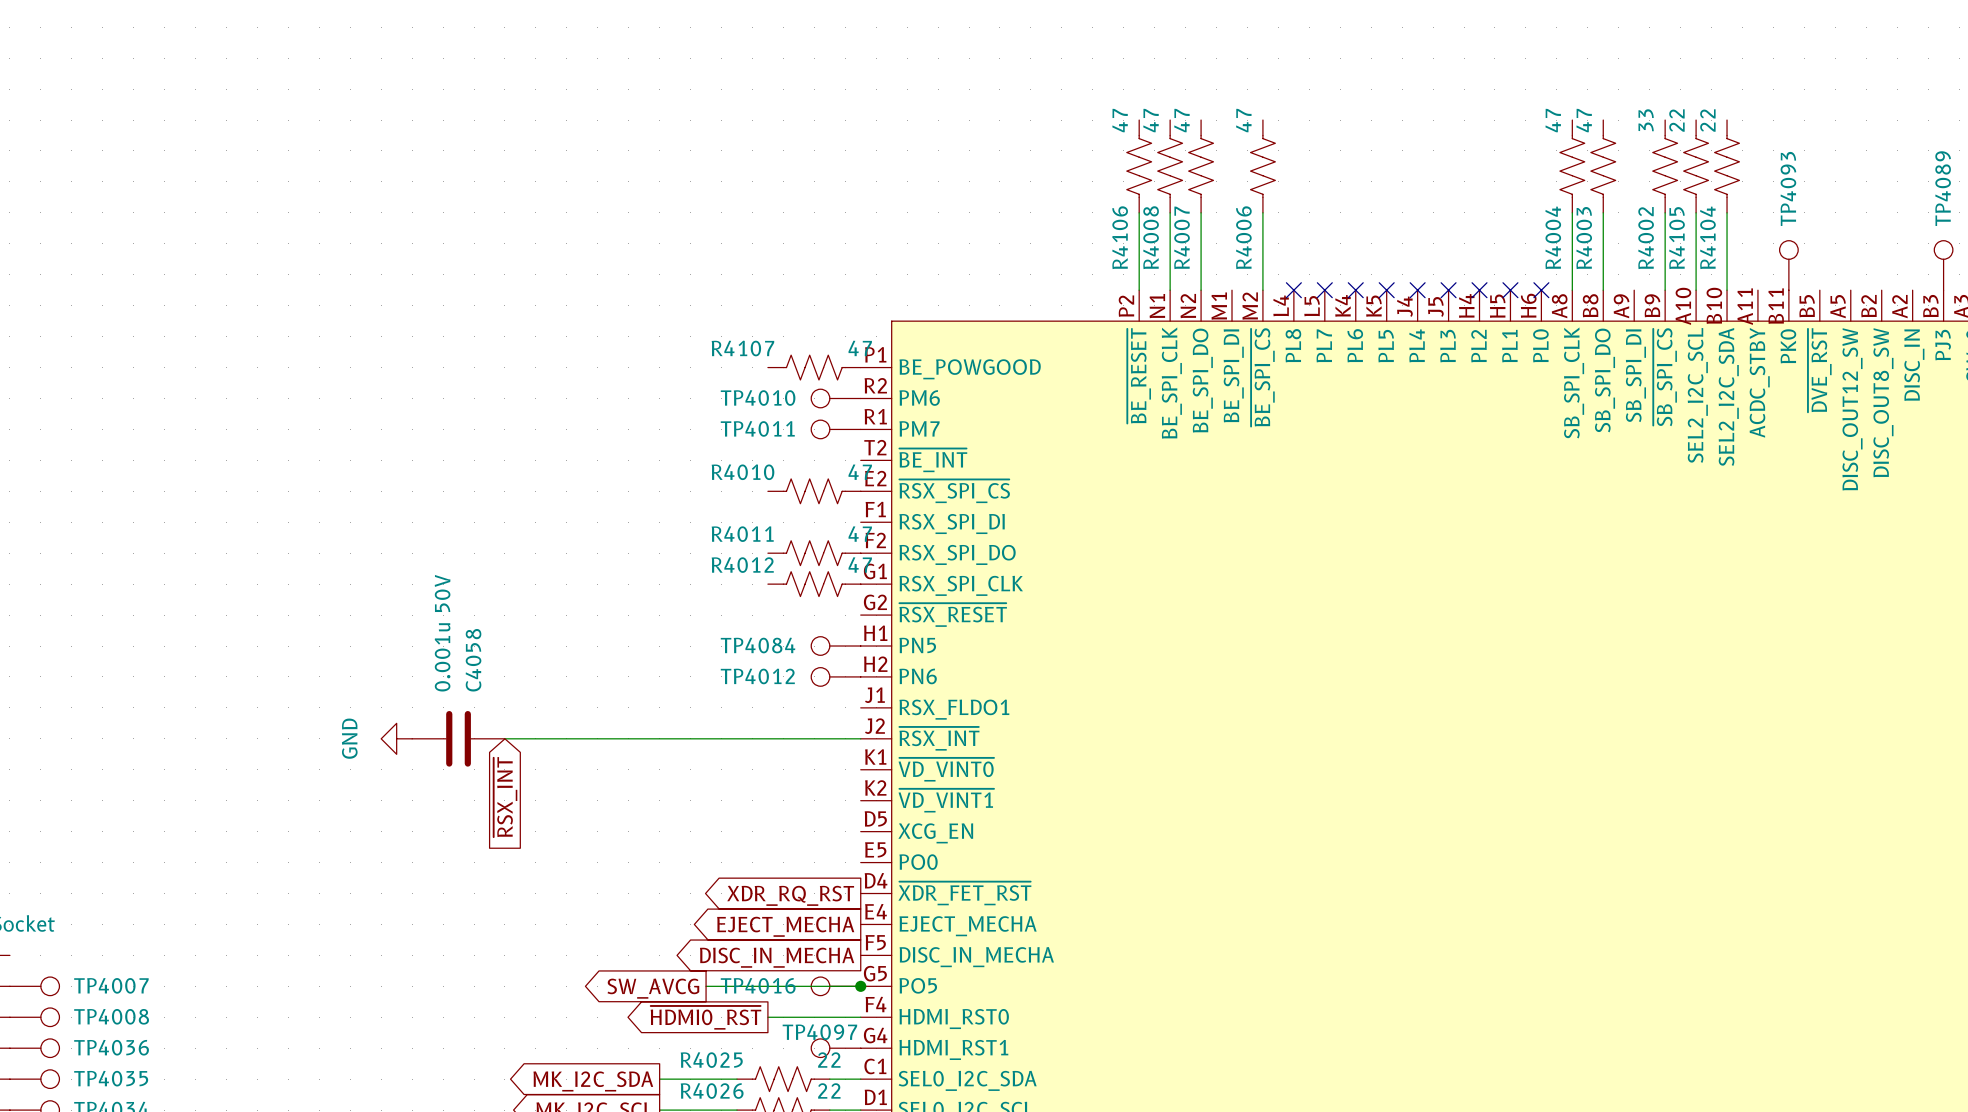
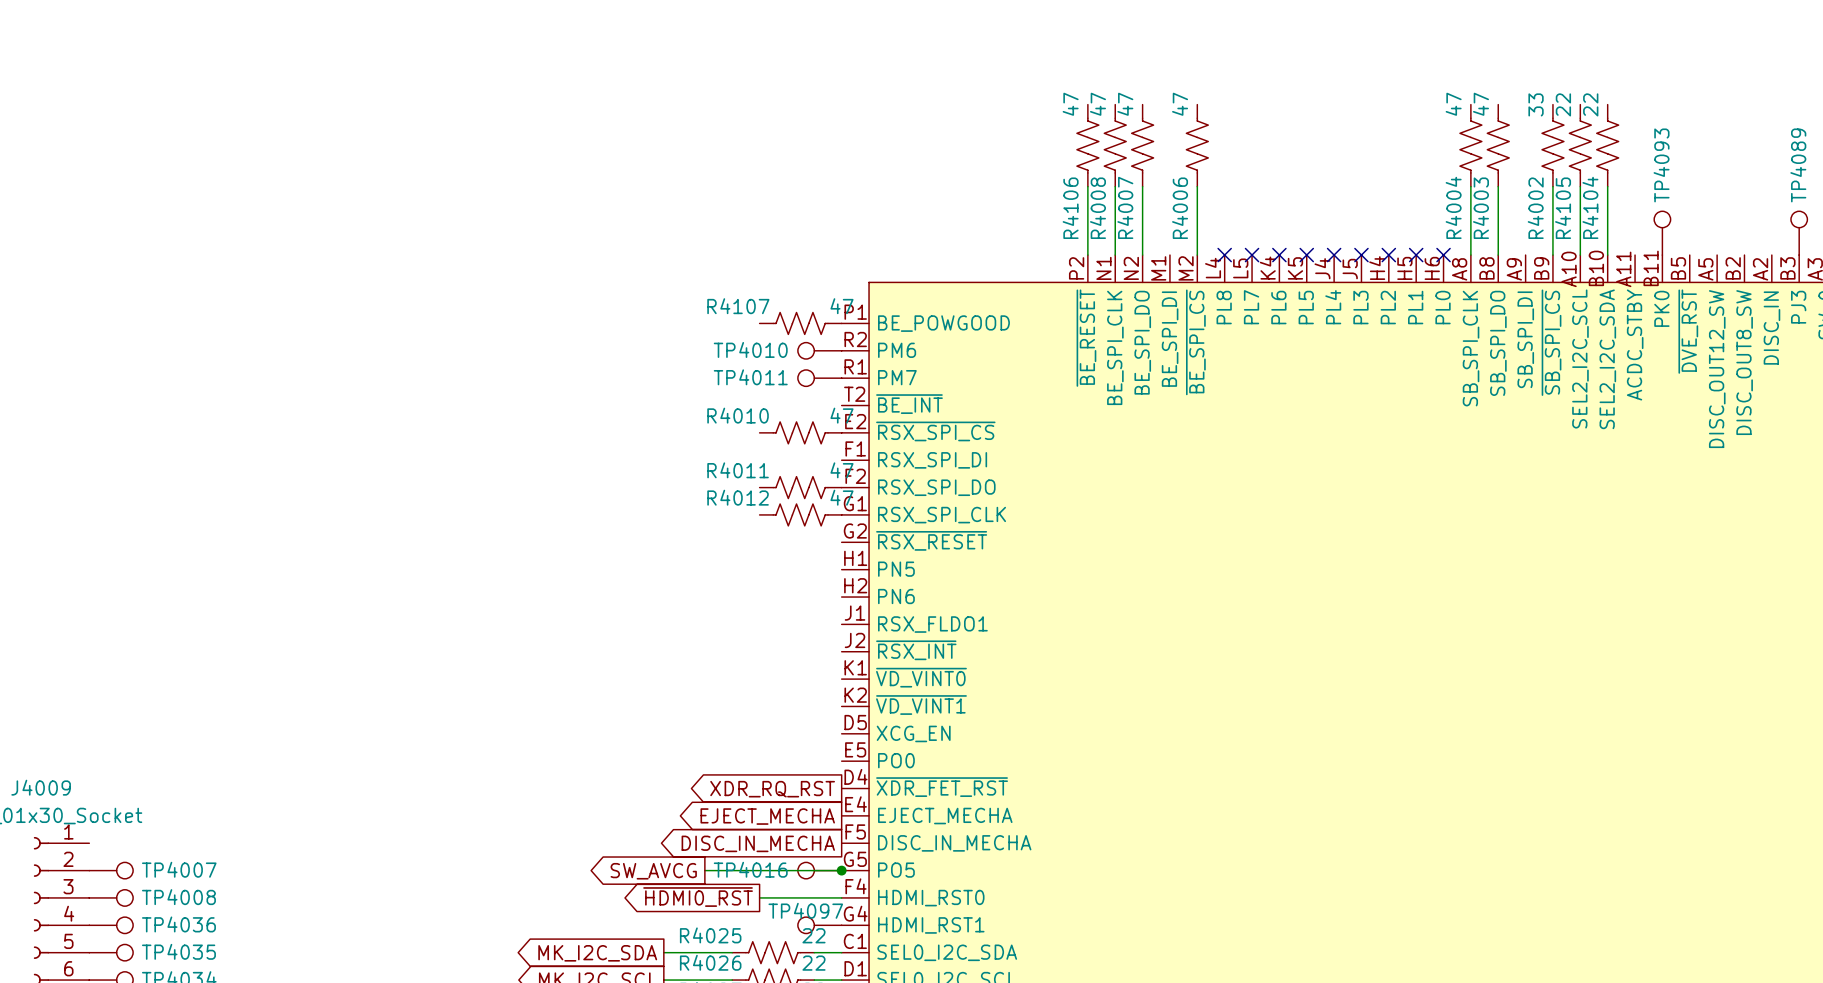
TP4084: (835, 646) -> none
TP4012: (835, 676) -> none
power symbol: GND (396, 738) -> none
C4058: 0.001u 50V (458, 738) -> none
wire: (504, 738) (860, 738) -> none
global label: ~{RSX_INT} (505, 797) -> none

